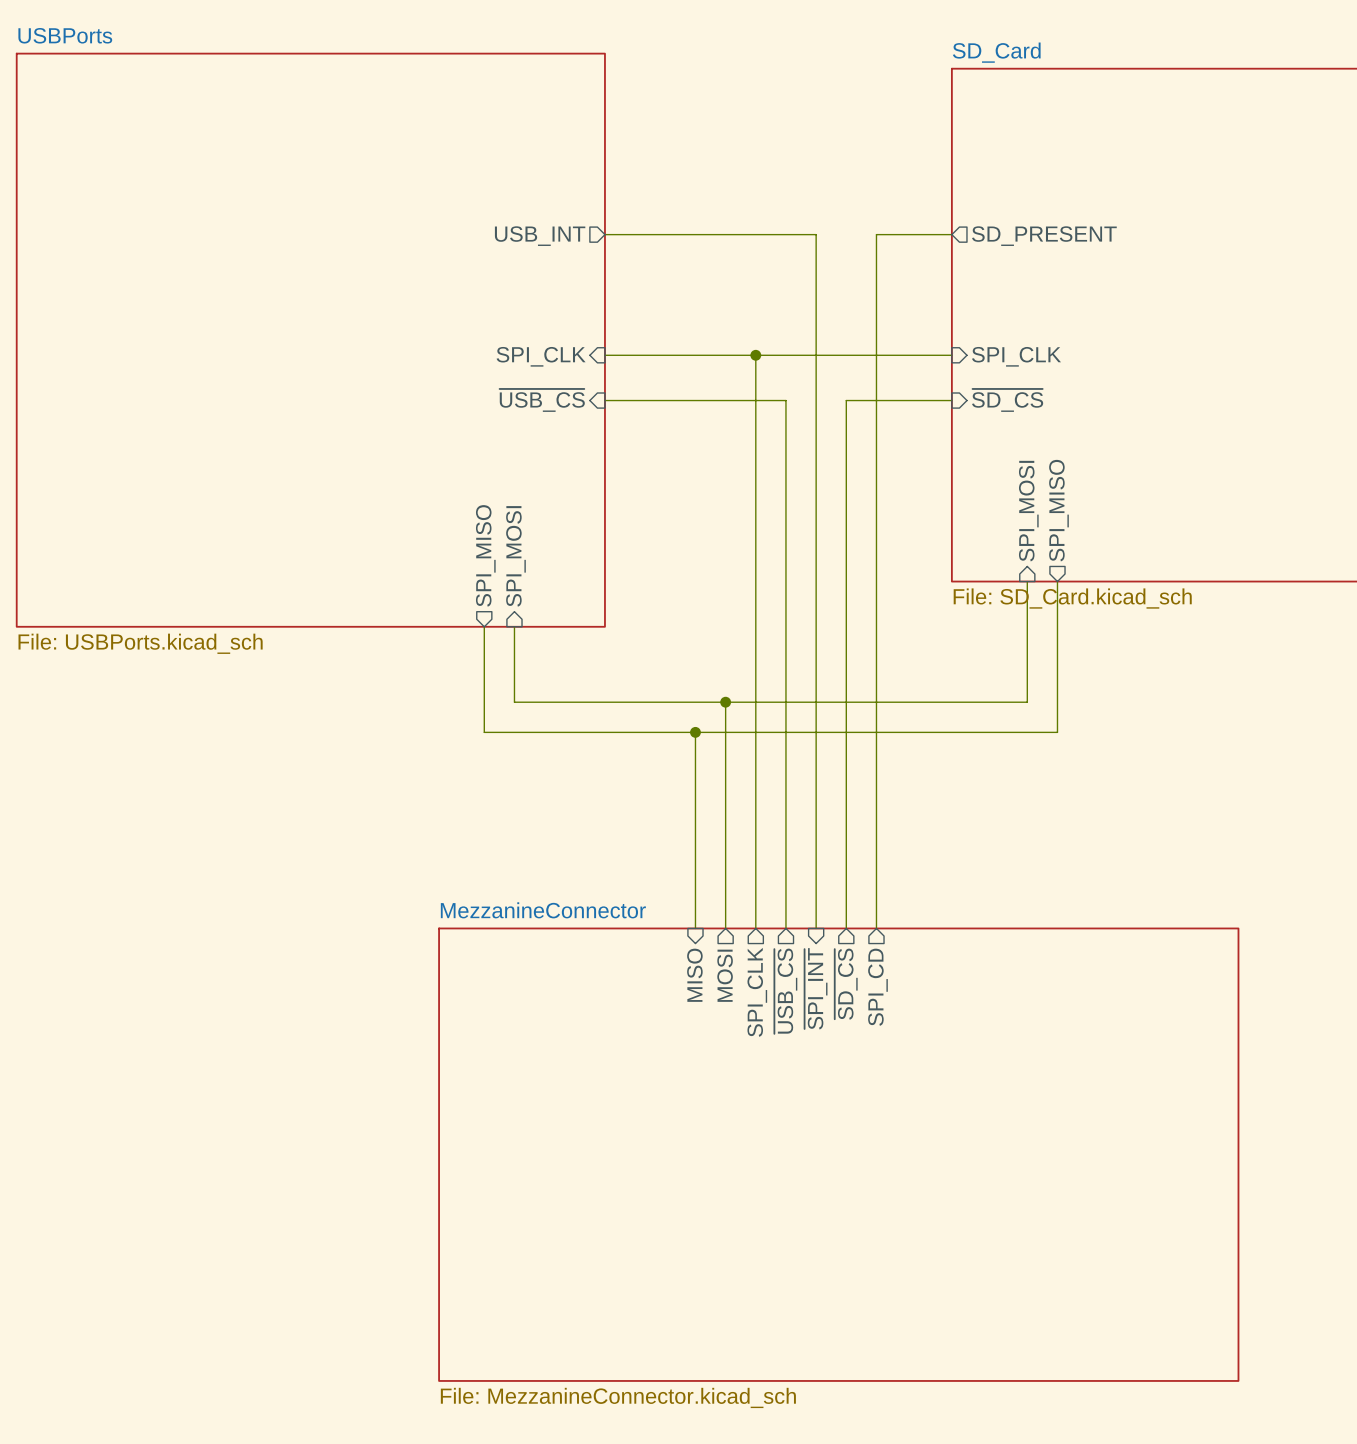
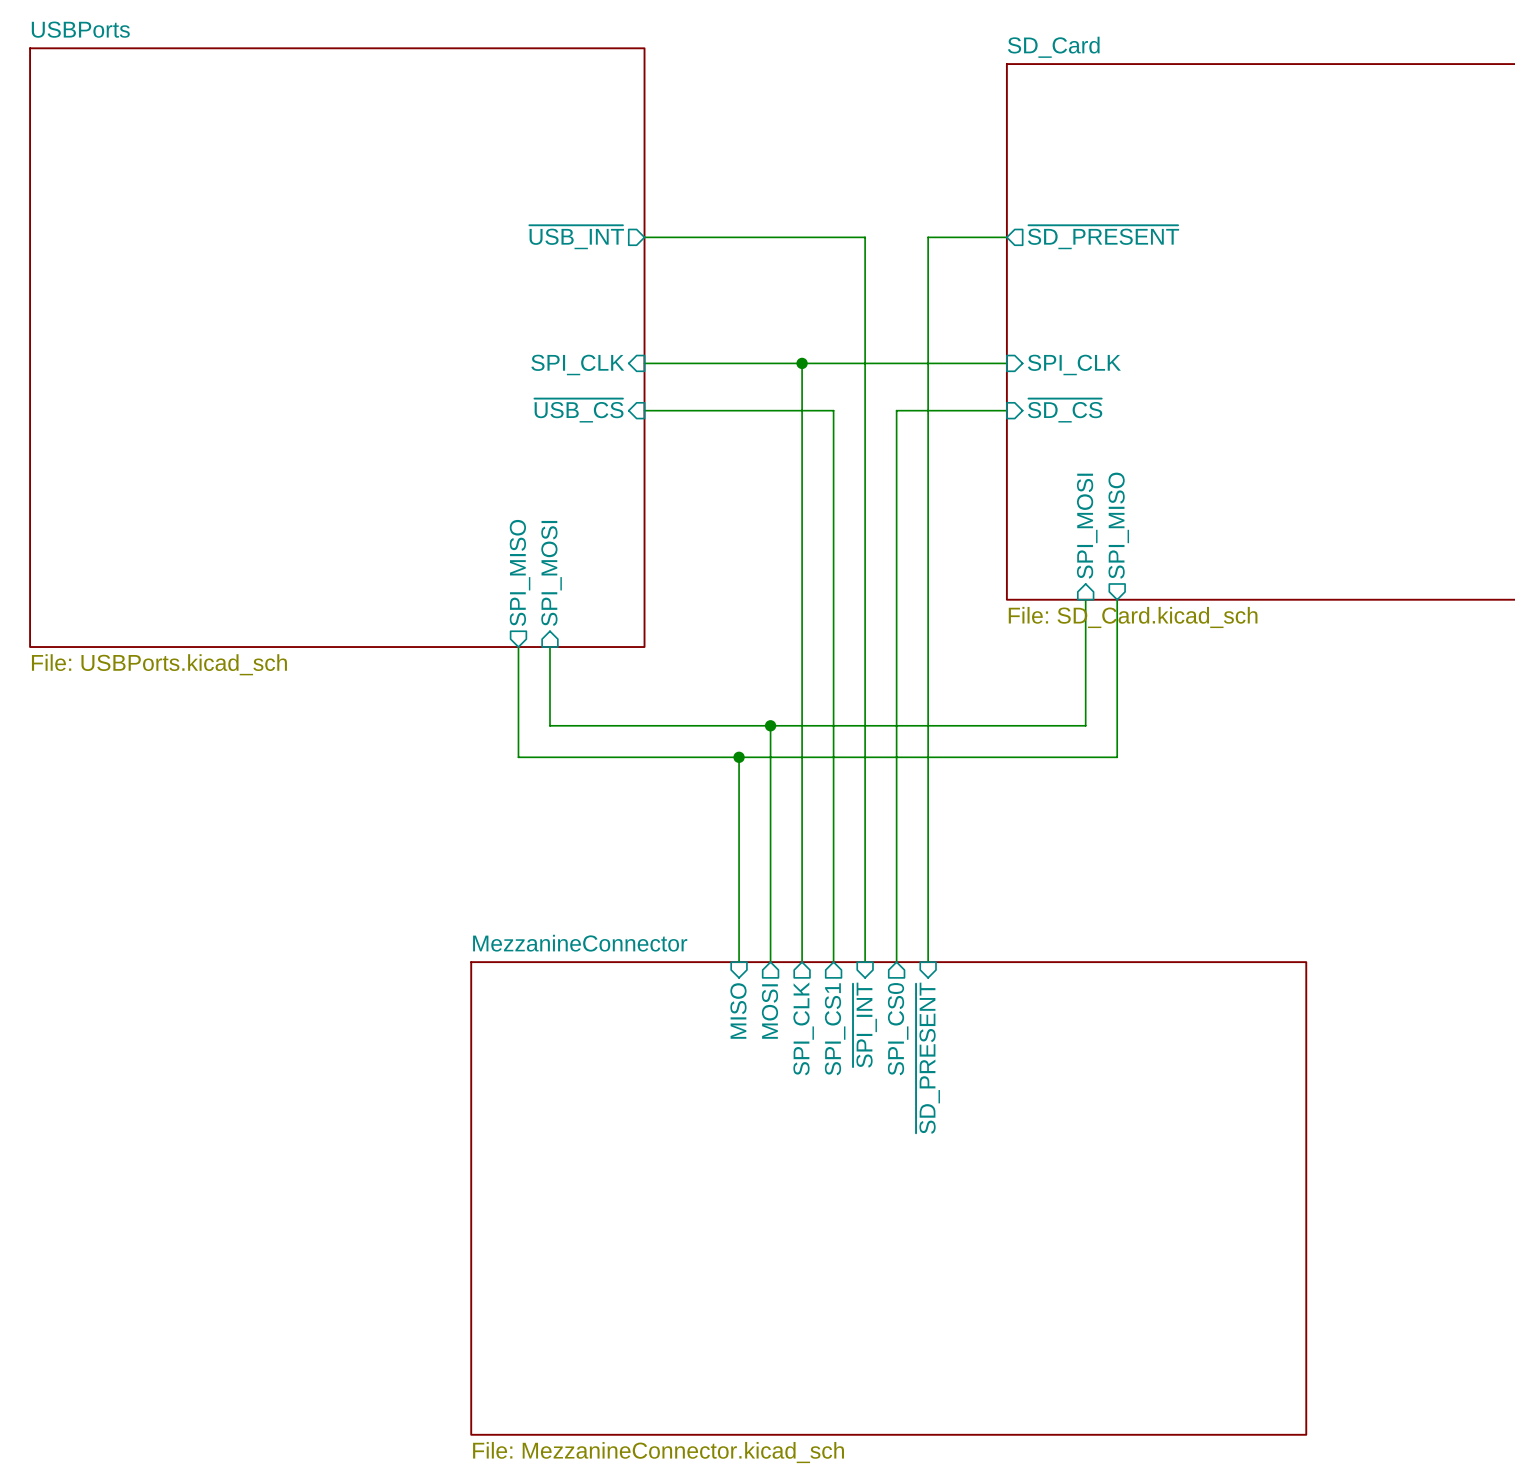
sheet pin: USB_INT (540, 236) -> ~{USB_INT} (576, 237)
sheet pin: SD_PRESENT (1044, 236) -> ~{SD_PRESENT} (1103, 237)
sheet pin: ~{SD_CS} (846, 984) -> SPI_CS0 (898, 1029)
sheet pin shape: output (877, 987) -> input (928, 1058)
sheet pin: SPI_CD (877, 987) -> ~{SD_PRESENT} (928, 1058)
sheet pin: ~{USB_CS} (785, 991) -> SPI_CS1 (835, 1029)

